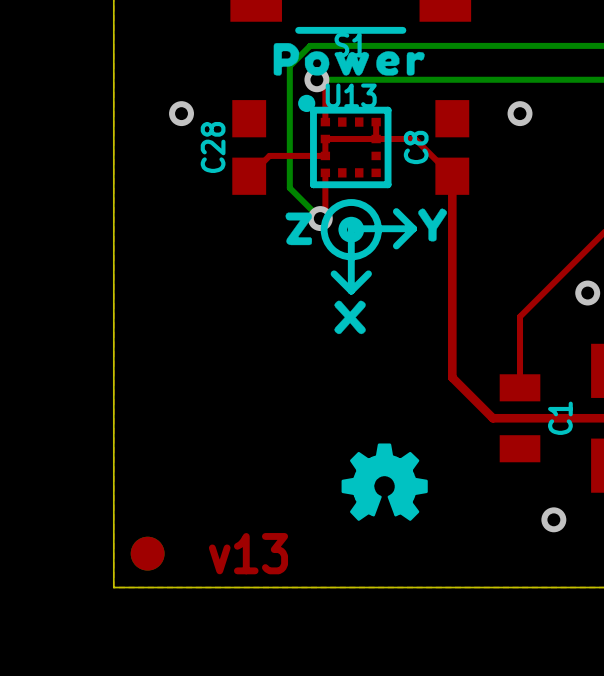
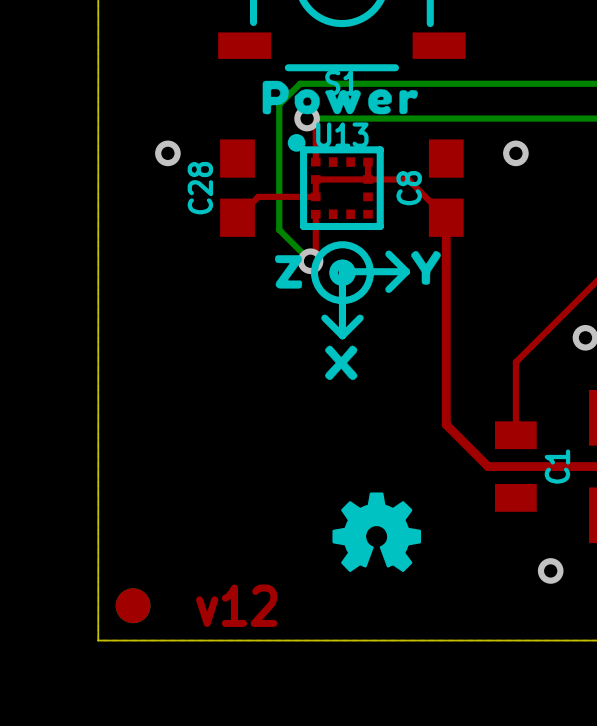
text: v13 (248, 553) -> v12 (236, 605)

